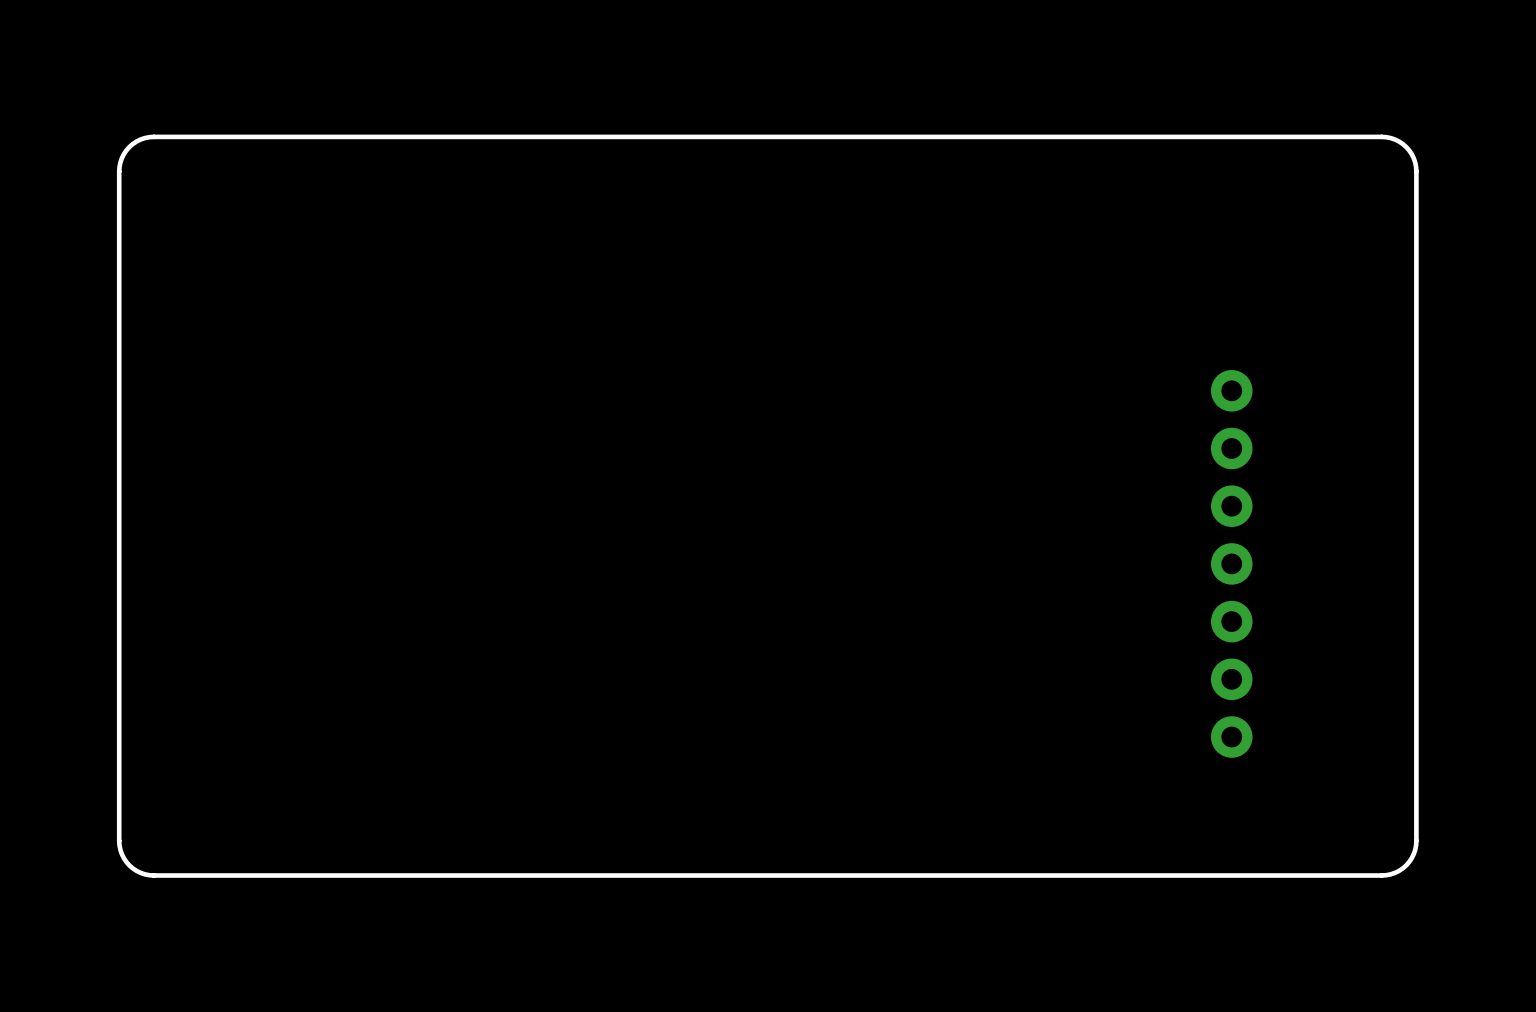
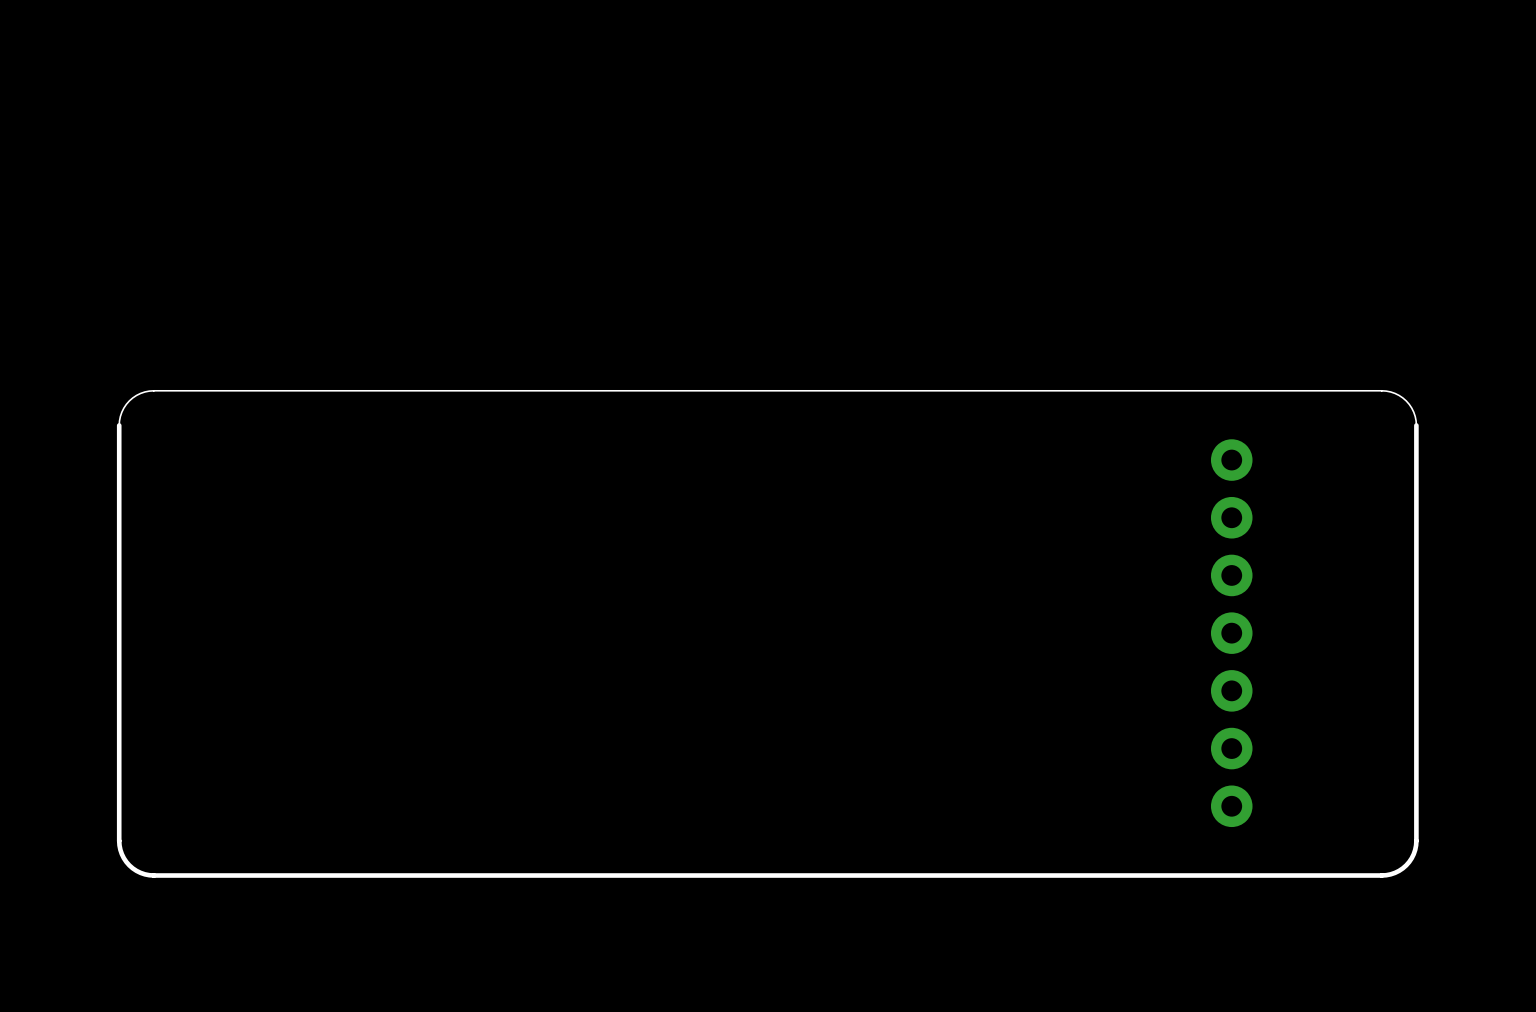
board edge: (1416, 425) (1416, 167) (1413, 158) (1406, 147) (1395, 139) (1381, 136) (144, 138) (129, 147) (121, 158) (119, 167) (119, 425) -> (1416, 425) (1413, 412) (1406, 400) (1395, 393) (1381, 390) (153, 390) (140, 393) (129, 400) (121, 412) (119, 425)
part position: (1231, 563) -> (1231, 633)

